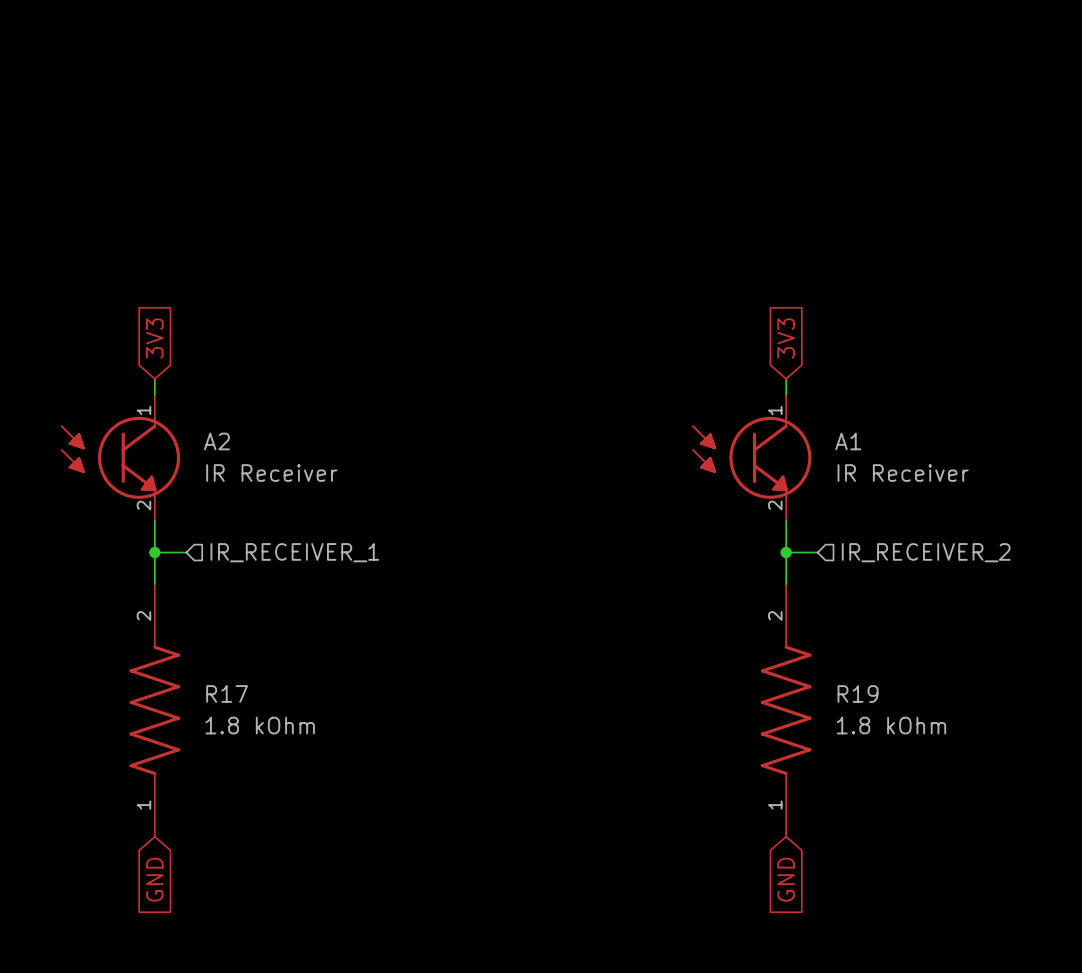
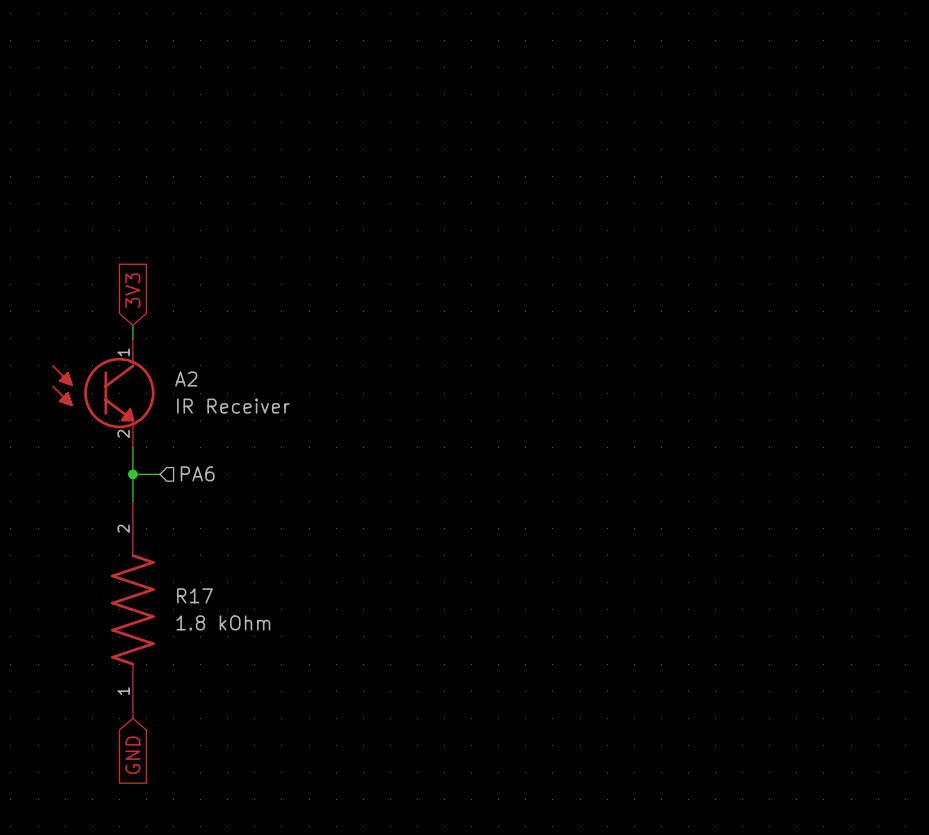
global label: 3V3 (786, 338) -> none
wire: (786, 378) (786, 394) -> none
A1: IR Receiver (751, 457) -> none
wire: (786, 520) (786, 584) -> none
hierarchical label: IR_RECEIVER_1 (294, 552) -> PA6 (197, 473)
wire: (786, 552) (817, 552) -> none
junction: (786, 552) -> none
hierarchical label: IR_RECEIVER_2 (926, 552) -> none
R19: 1.8 kOhm (786, 710) -> none
global label: GND (786, 879) -> none

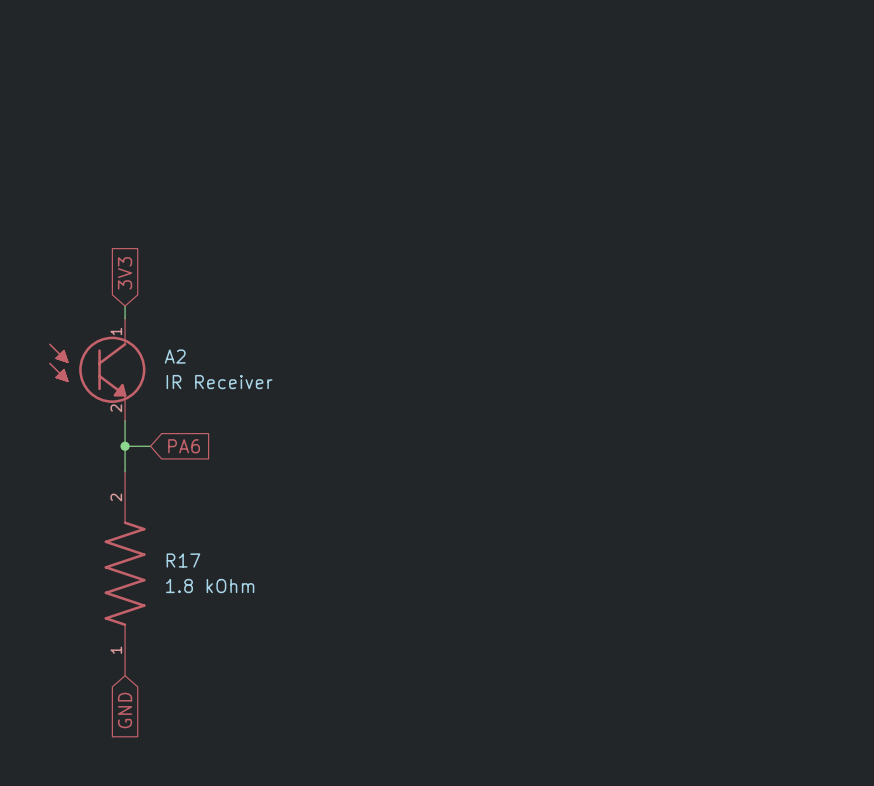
hierarchical label: PA6 (197, 473) -> none
global label: none -> PA6 (184, 446)

